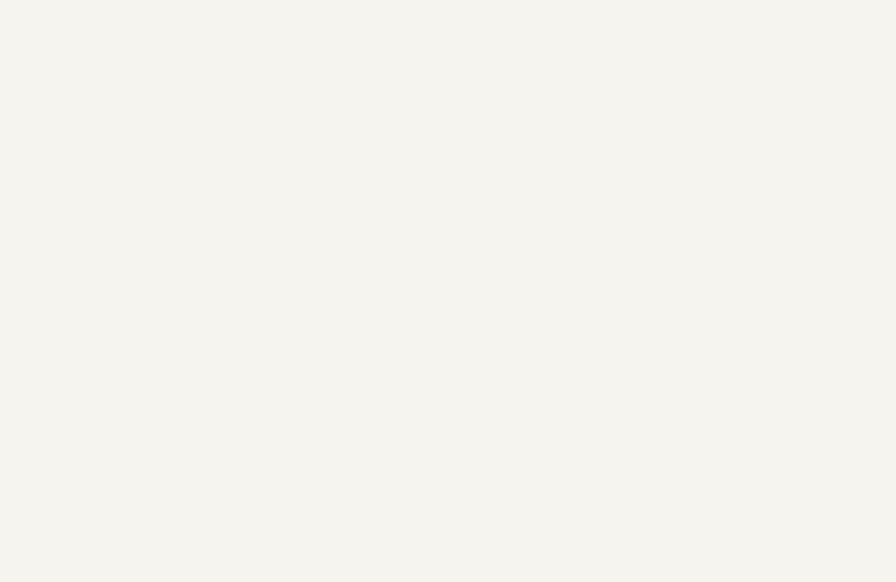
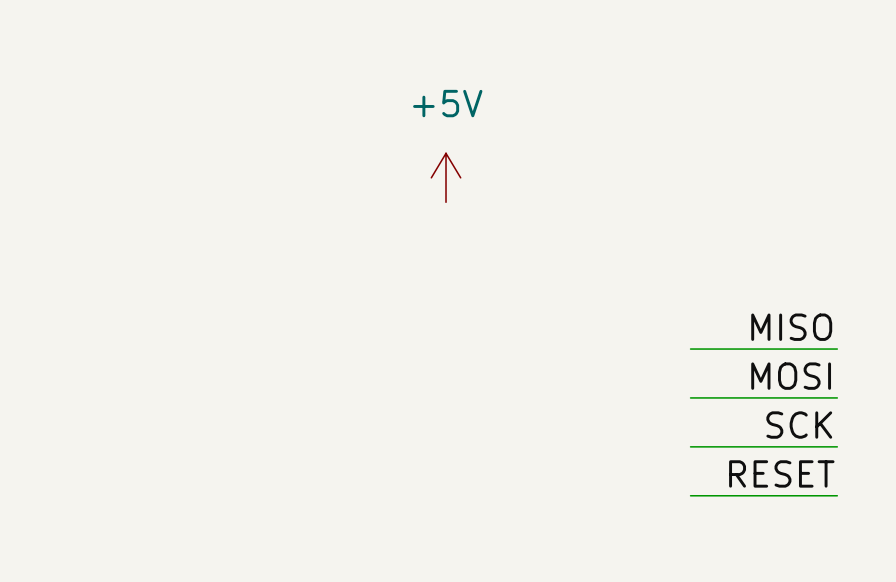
power symbol: none -> +5V (446, 177)
label: none -> MISO (791, 327)
wire: none -> (690, 349) (837, 349)
label: none -> MOSI (791, 376)
wire: none -> (690, 397) (837, 397)
label: none -> SCK (799, 425)
wire: none -> (690, 446) (837, 446)
label: none -> RESET (781, 473)
wire: none -> (690, 495) (837, 495)

